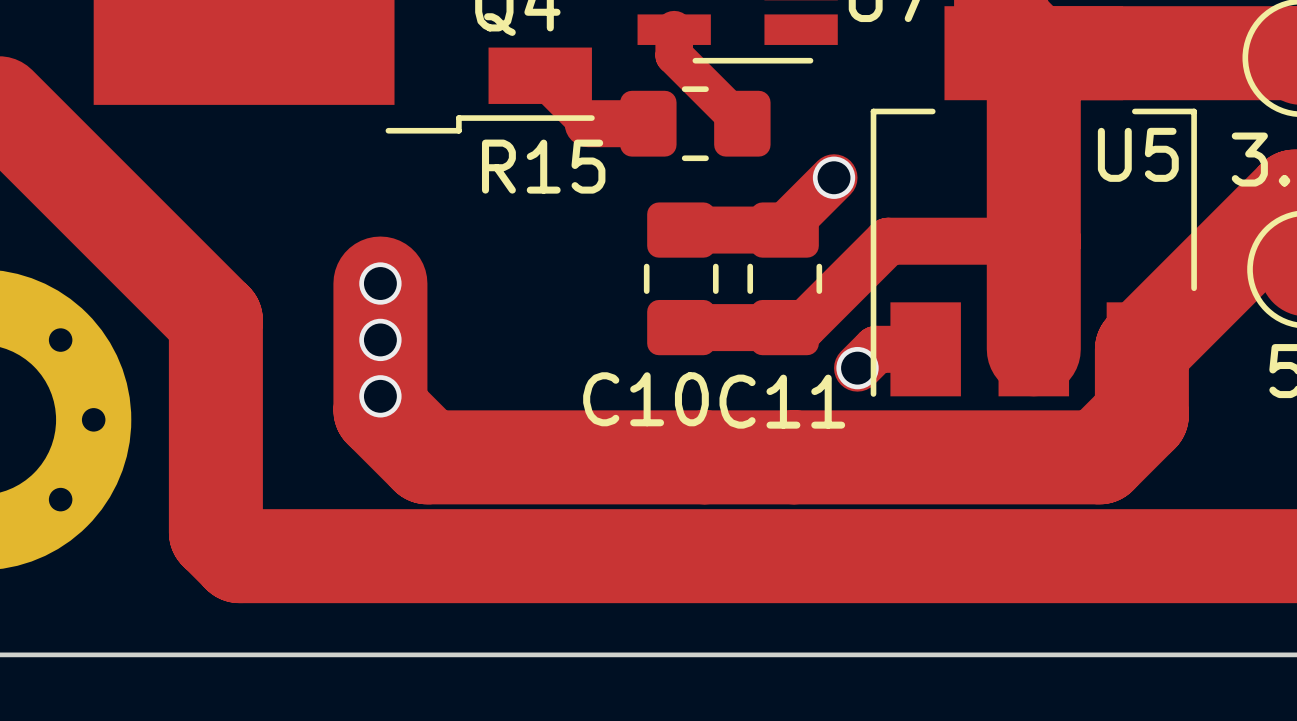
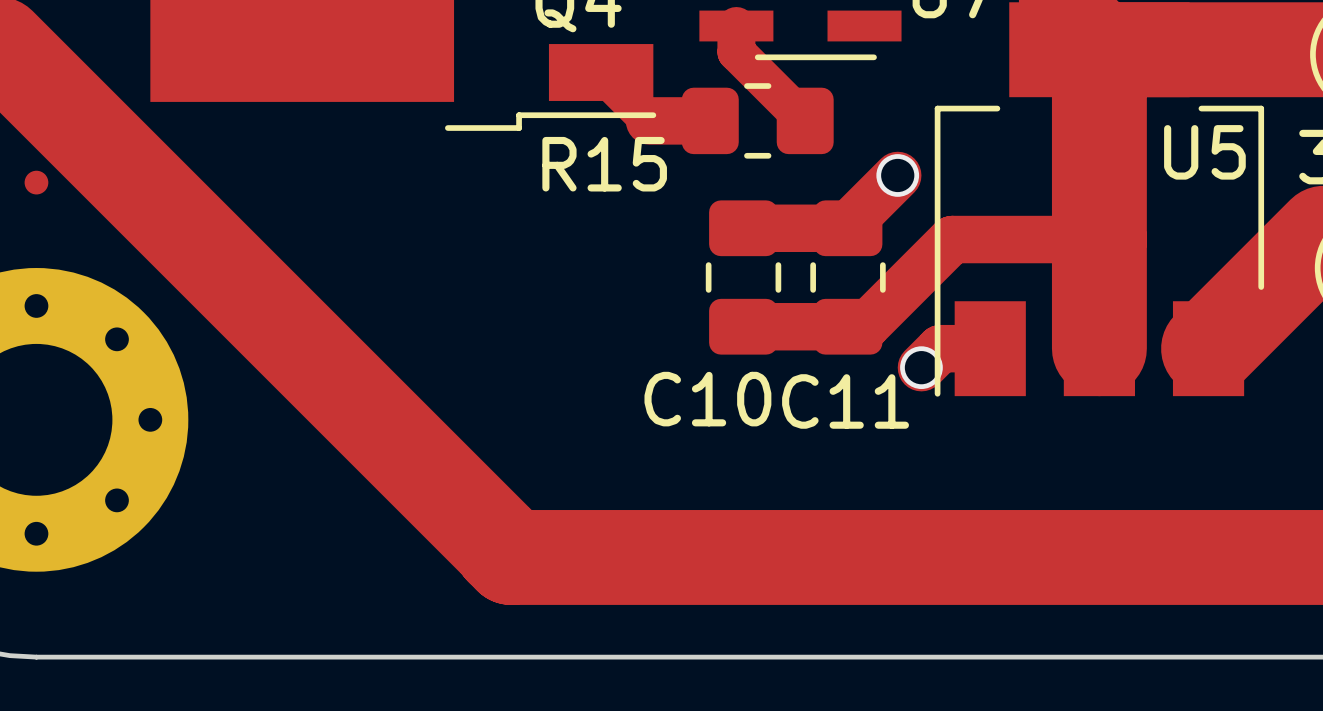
track: (380, 283) (380, 410) (427, 457) (1099, 457) (1141, 415) (1141, 349) -> none
via: (380, 283) -> none
track: (215, 320) (215, 532) (239, 556) (450, 556) -> (273, 319) (510, 557)
via: (380, 339) -> none
via: (380, 396) -> none

